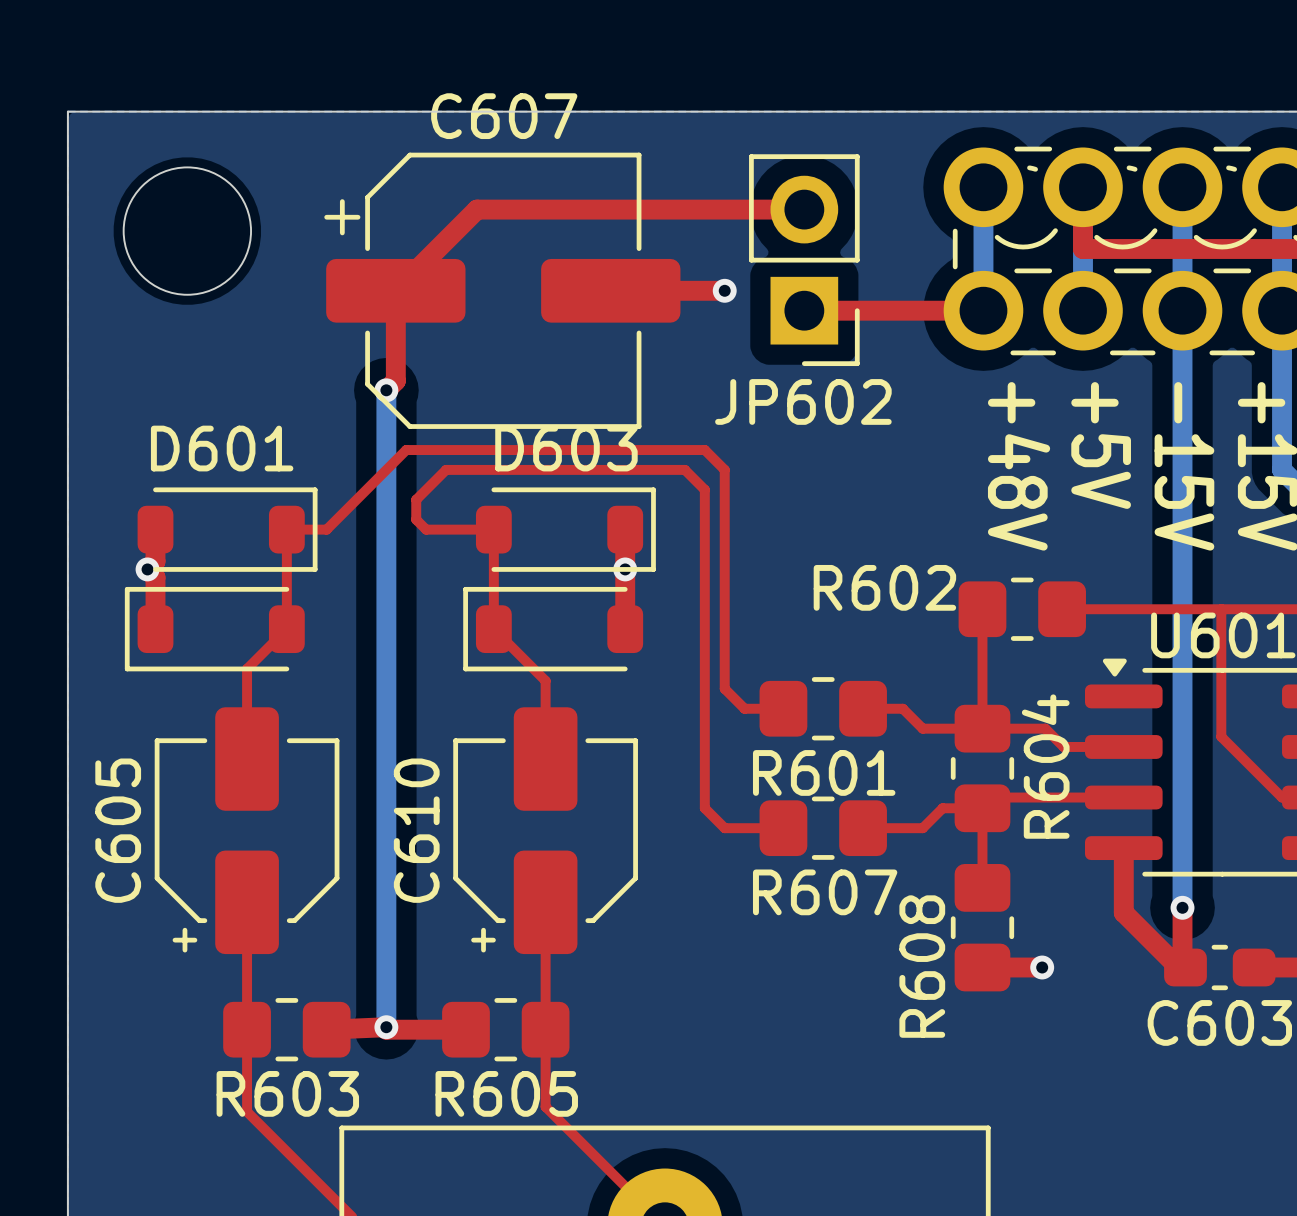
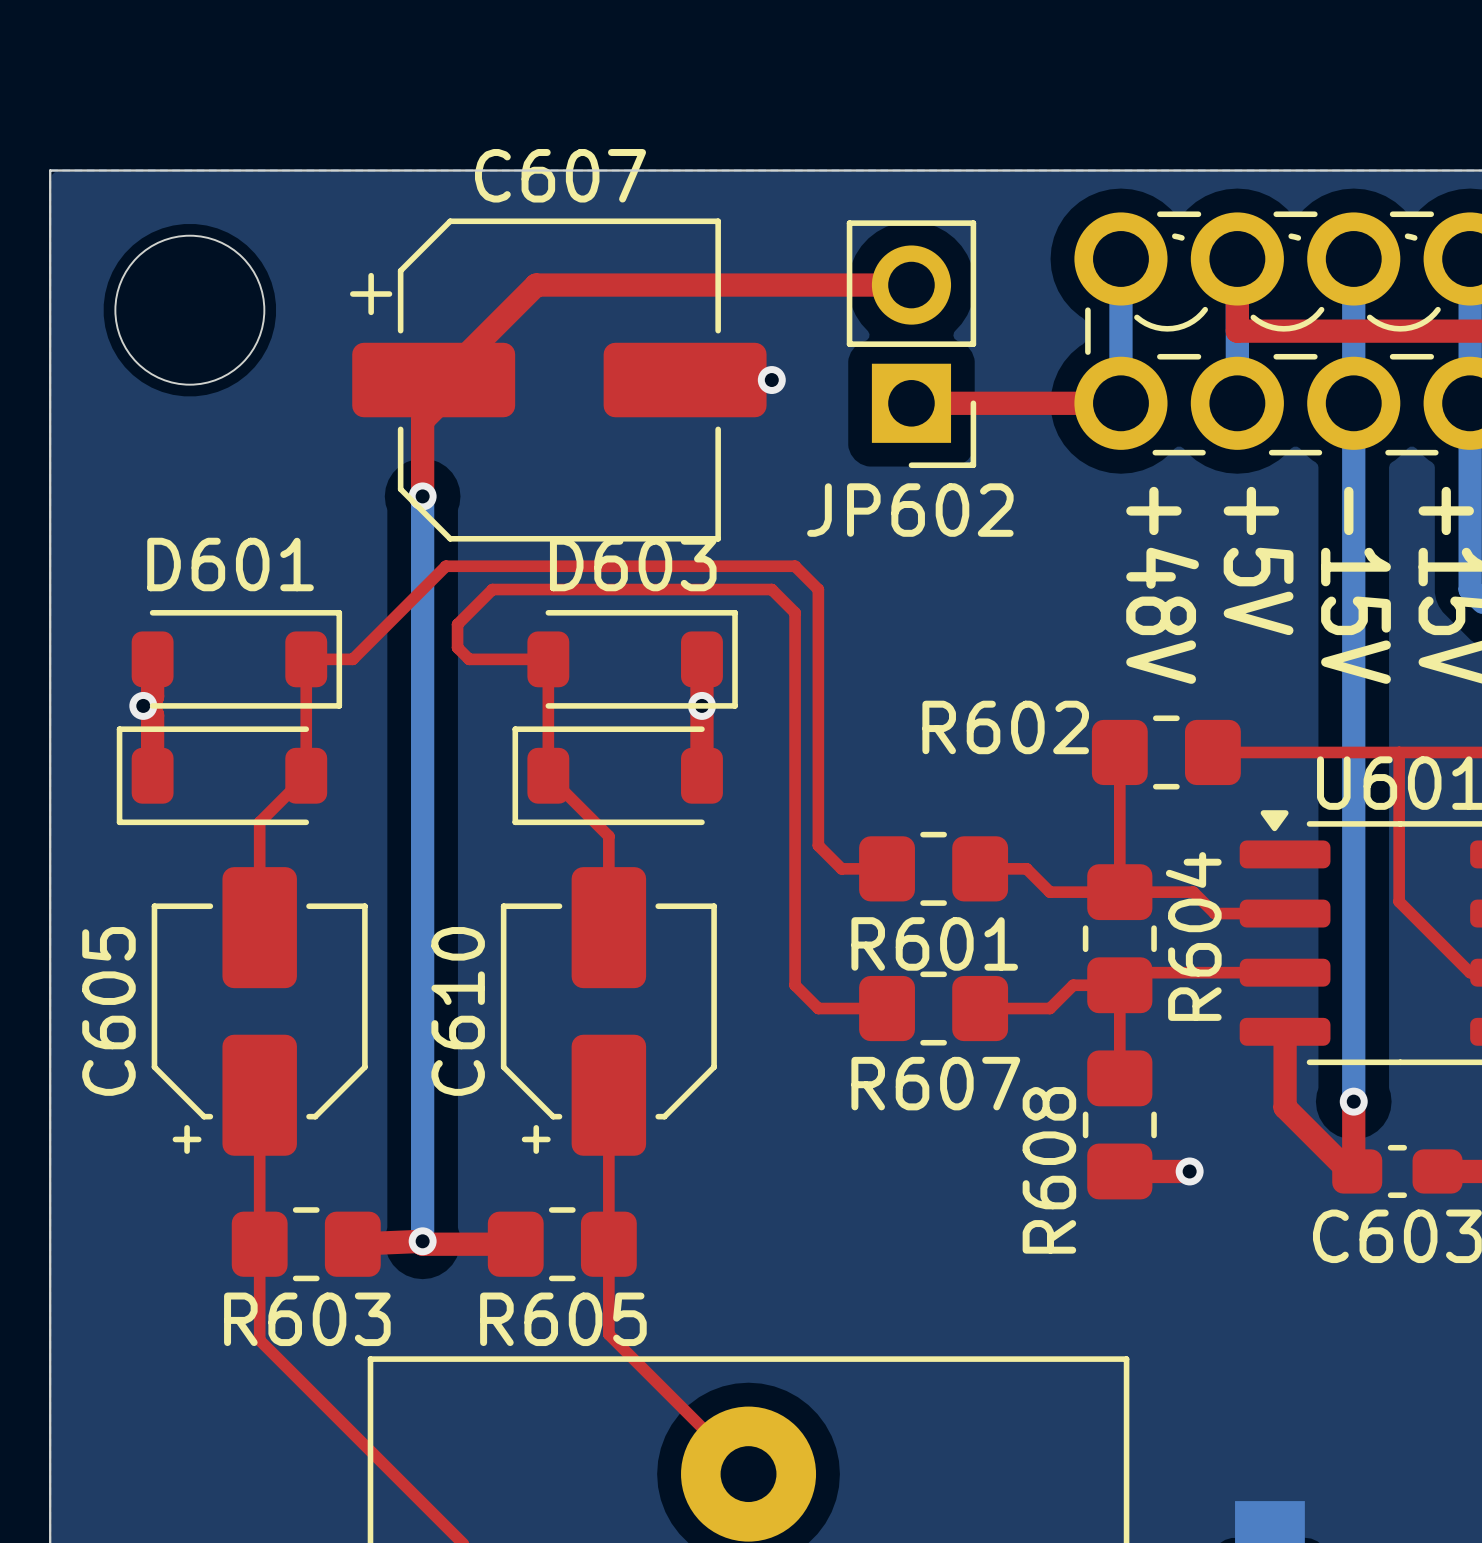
top track: (483, 209) (477, 209) (395, 290) (395, 380) (386, 390) -> (536, 285) (441, 380)
top track: none -> (463, 380) (422, 420) (422, 496)
top track: (684, 290) (724, 290) -> none
via position: (724, 290) -> (771, 380)

